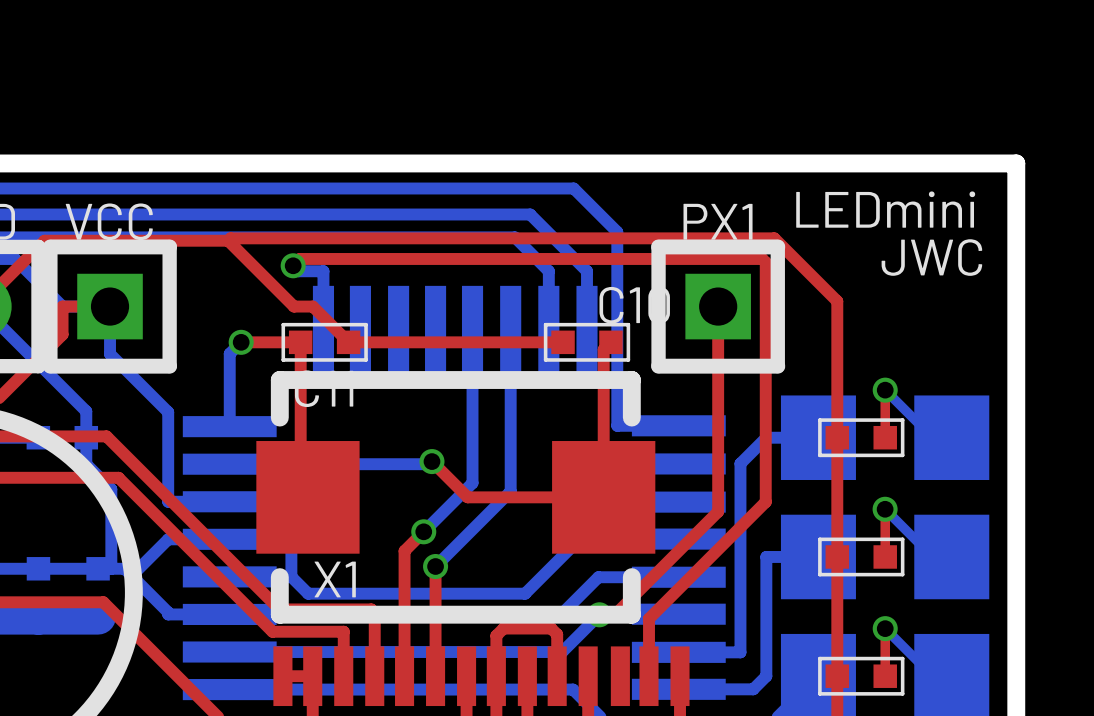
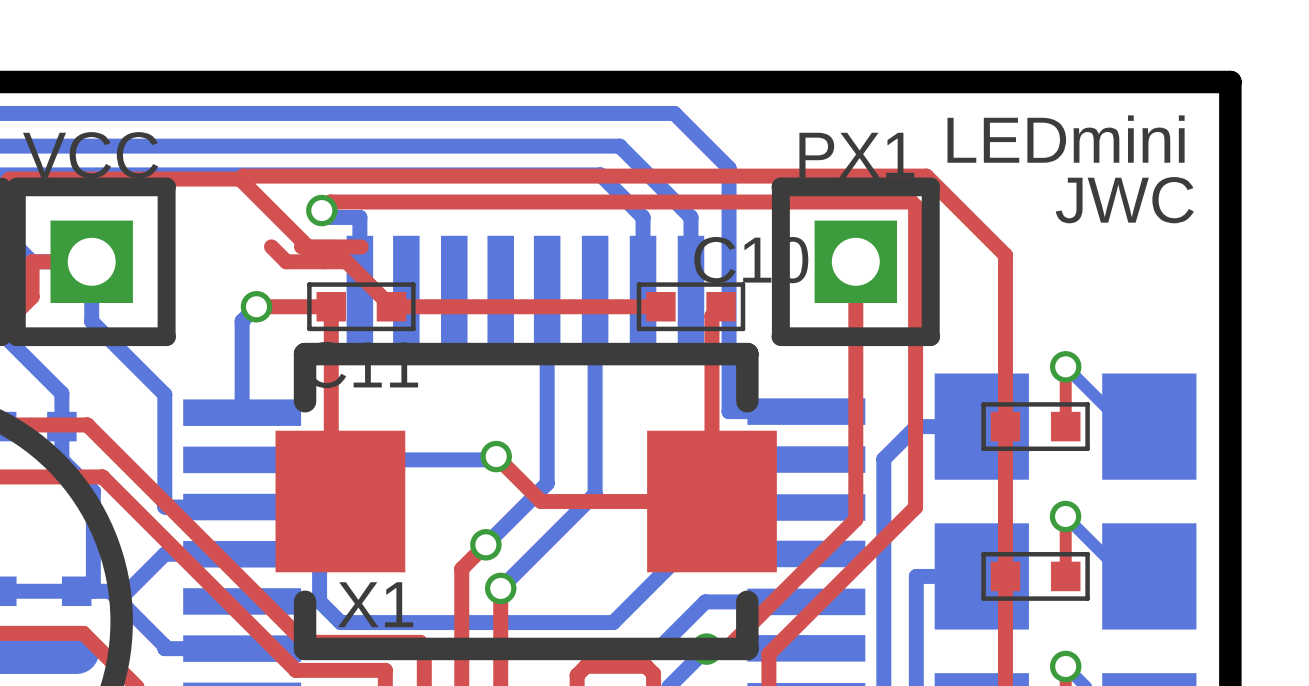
top track: none -> (271, 246) (286, 261) (322, 261)
top track: none -> (301, 246) (361, 246)

